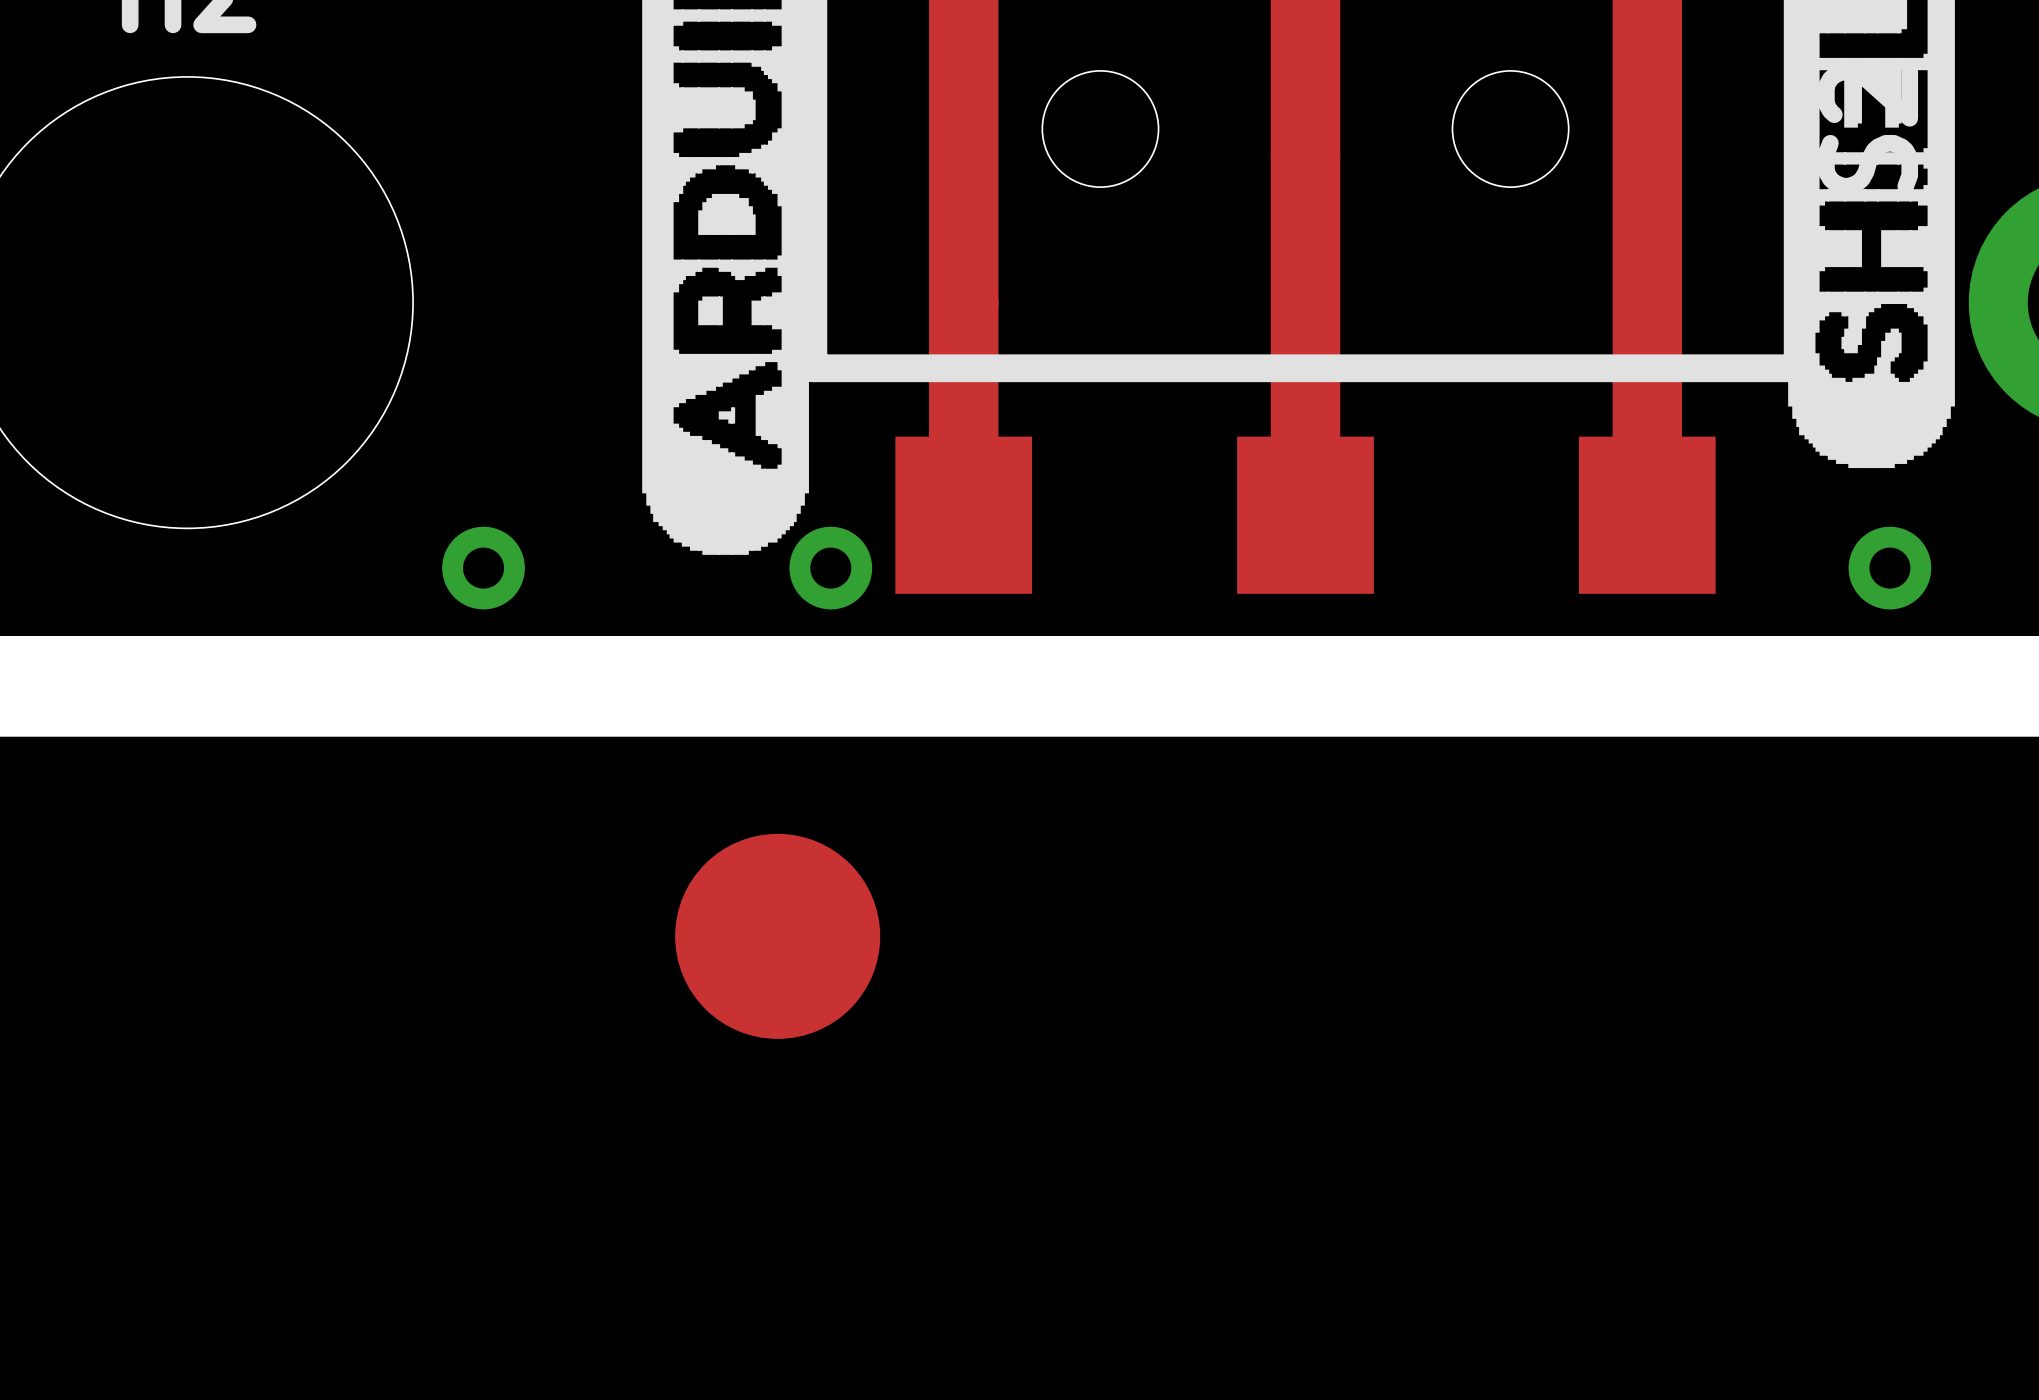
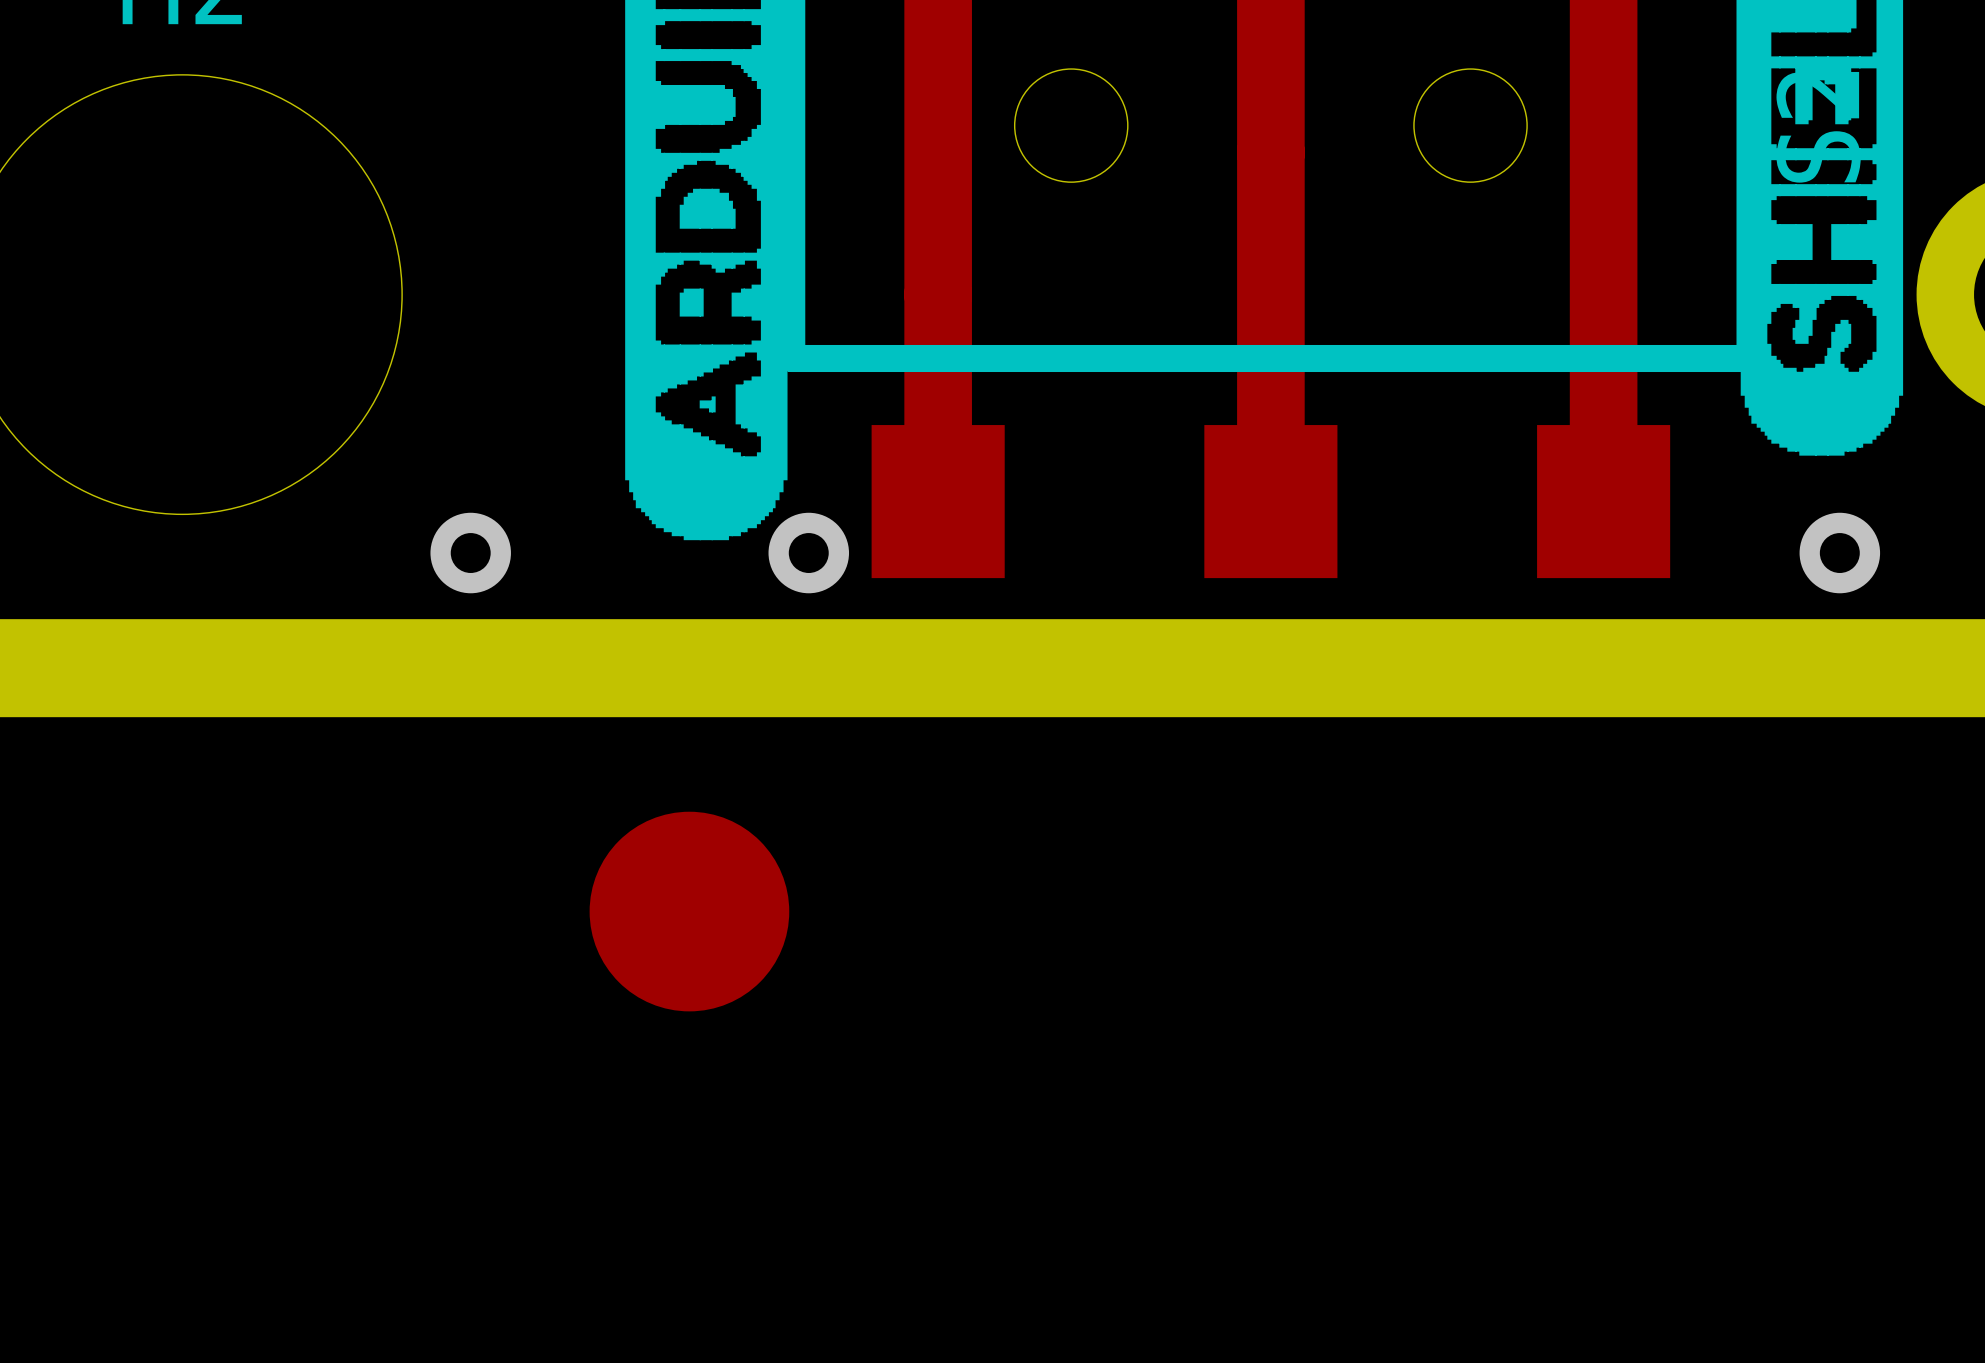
part position: (777, 936) -> (689, 911)

